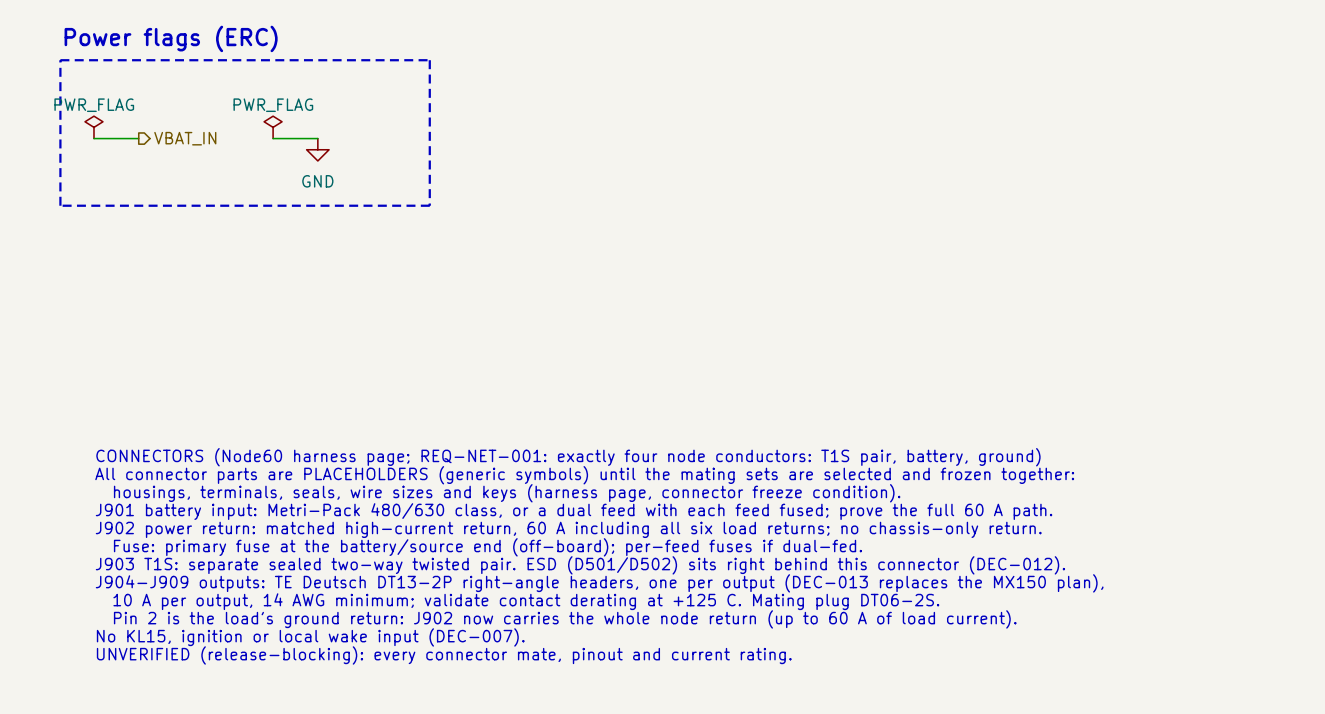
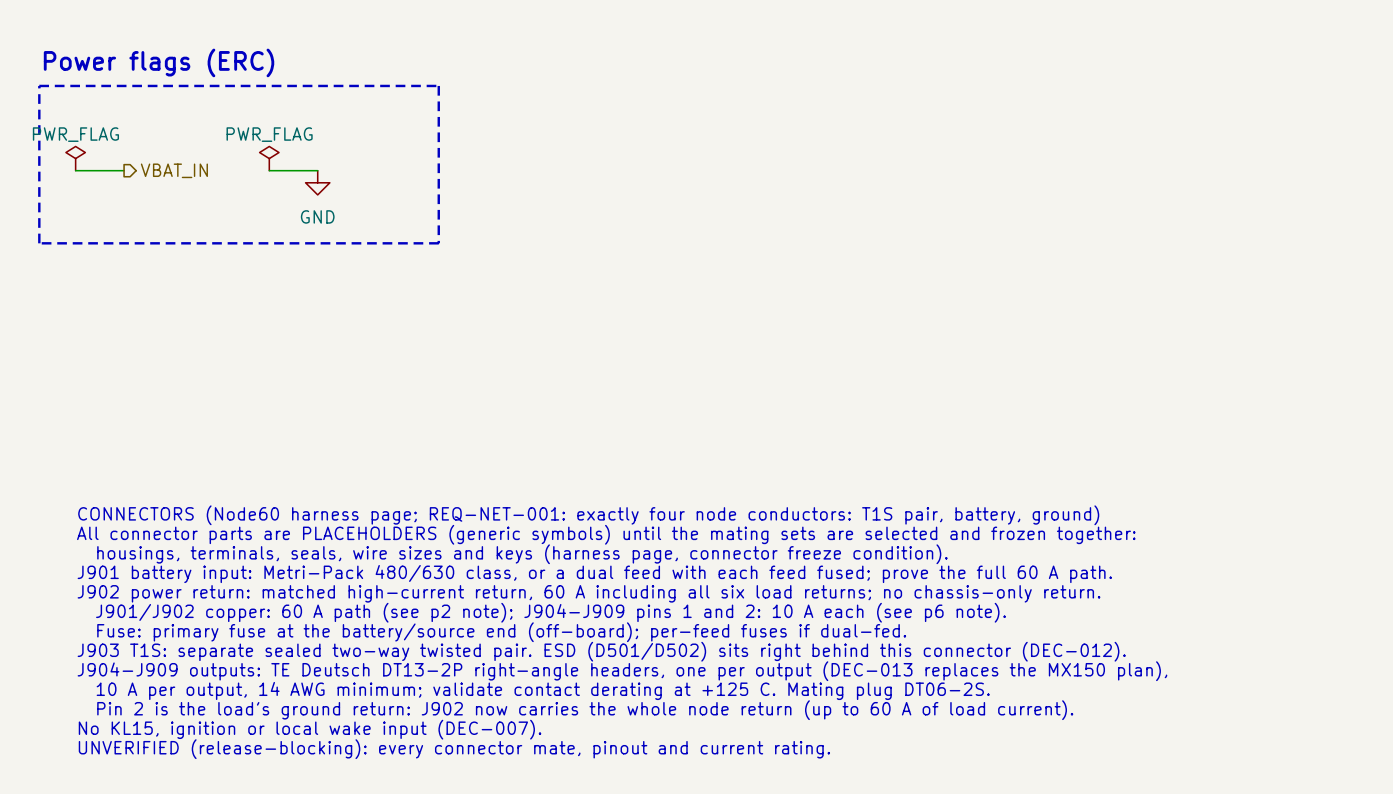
text: Fuse: primary fuse at the battery/source end (off-board); per-feed fuses if dual-fed. (487, 547) -> J901/J902 copper: 60 A path (see p2 note); J904-J909 pins 1 and 2: 10 A each (see p6 note). (550, 612)
text: J903 T1S: separate sealed two-way twisted pair. ESD (D501/D502) sits right behind this connector (DEC-012). (580, 565) -> Fuse: primary fuse at the battery/source end (off-board); per-feed fuses if dual-fed. (501, 632)
text: J904-J909 outputs: TE Deutsch DT13-2P right-angle headers, one per output (DEC-013 replaces the MX150 plan), (599, 583) -> J903 T1S: separate sealed two-way twisted pair. ESD (D501/D502) sits right behind this connector (DEC-012). (601, 651)
text: 10 A per output, 14 AWG minimum; validate contact derating at +125 C. Mating plug DT06-2S. (526, 601) -> J904-J909 outputs: TE Deutsch DT13-2P right-angle headers, one per output (DEC-013 replaces the MX150 plan), (622, 671)
text: Pin 2 is the load's ground return: J902 now carries the whole node return (up to 60 A of load current). (565, 619) -> 10 A per output, 14 AWG minimum; validate contact derating at +125 C. Mating plug DT06-2S. (543, 690)
text: No KL15, ignition or local wake input (DEC-007). (310, 637) -> Pin 2 is the load's ground return: J902 now carries the whole node return (up to 60 A of load current). (585, 710)
text: UNVERIFIED (release-blocking): every connector mate, pinout and current rating. (444, 655) -> No KL15, ignition or local wake input (DEC-007). (310, 729)
text: none -> UNVERIFIED (release-blocking): every connector mate, pinout and current rating. (454, 749)

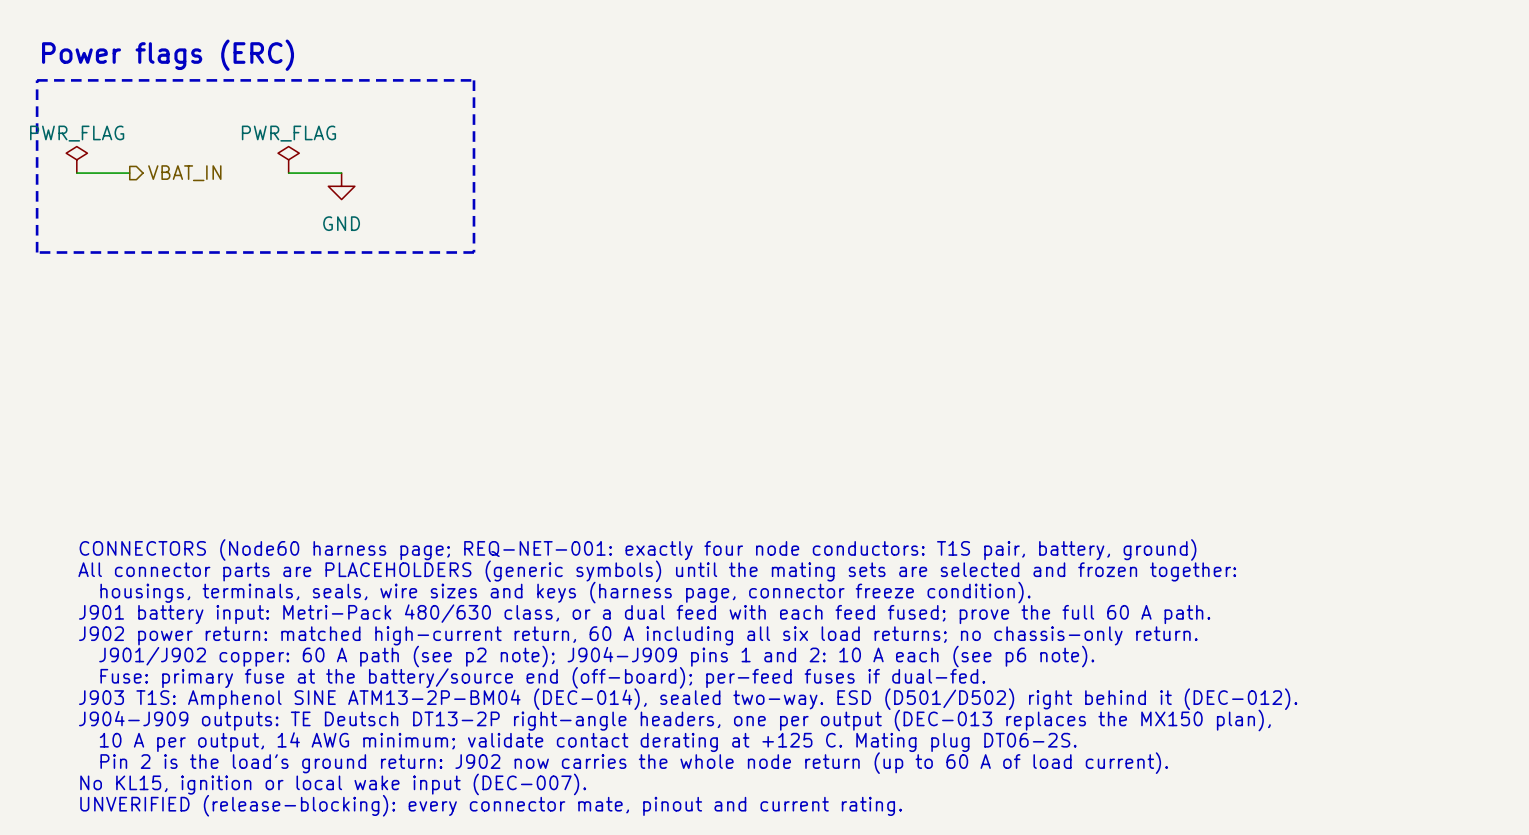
text: J903 T1S: separate sealed two-way twisted pair. ESD (D501/D502) sits right behind this connector (DEC-012). (601, 651) -> J903 T1S: Amphenol SINE ATM13-2P-BM04 (DEC-014), sealed two-way. ESD (D501/D502) right behind it (DEC-012). (688, 699)

